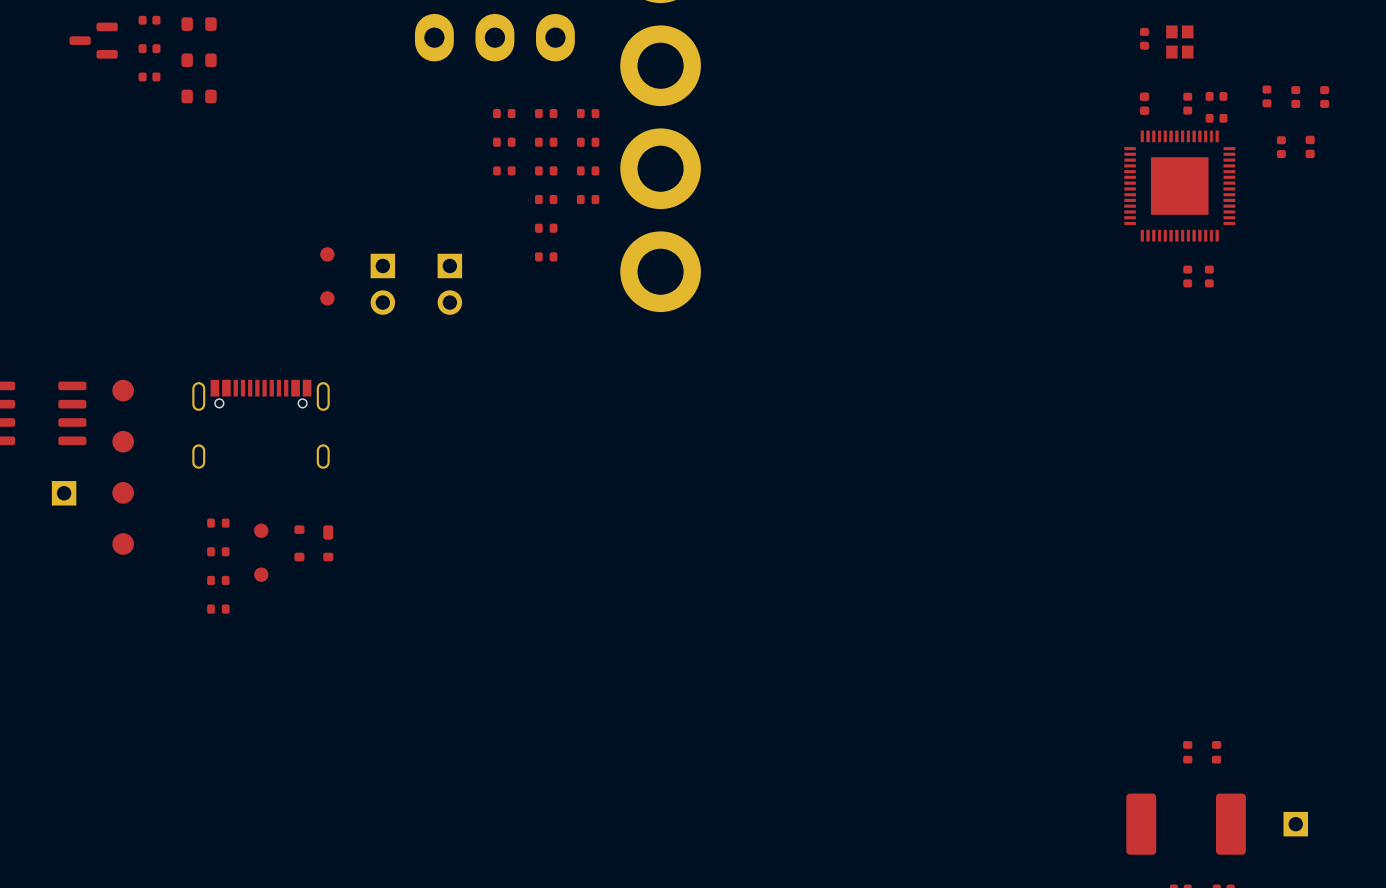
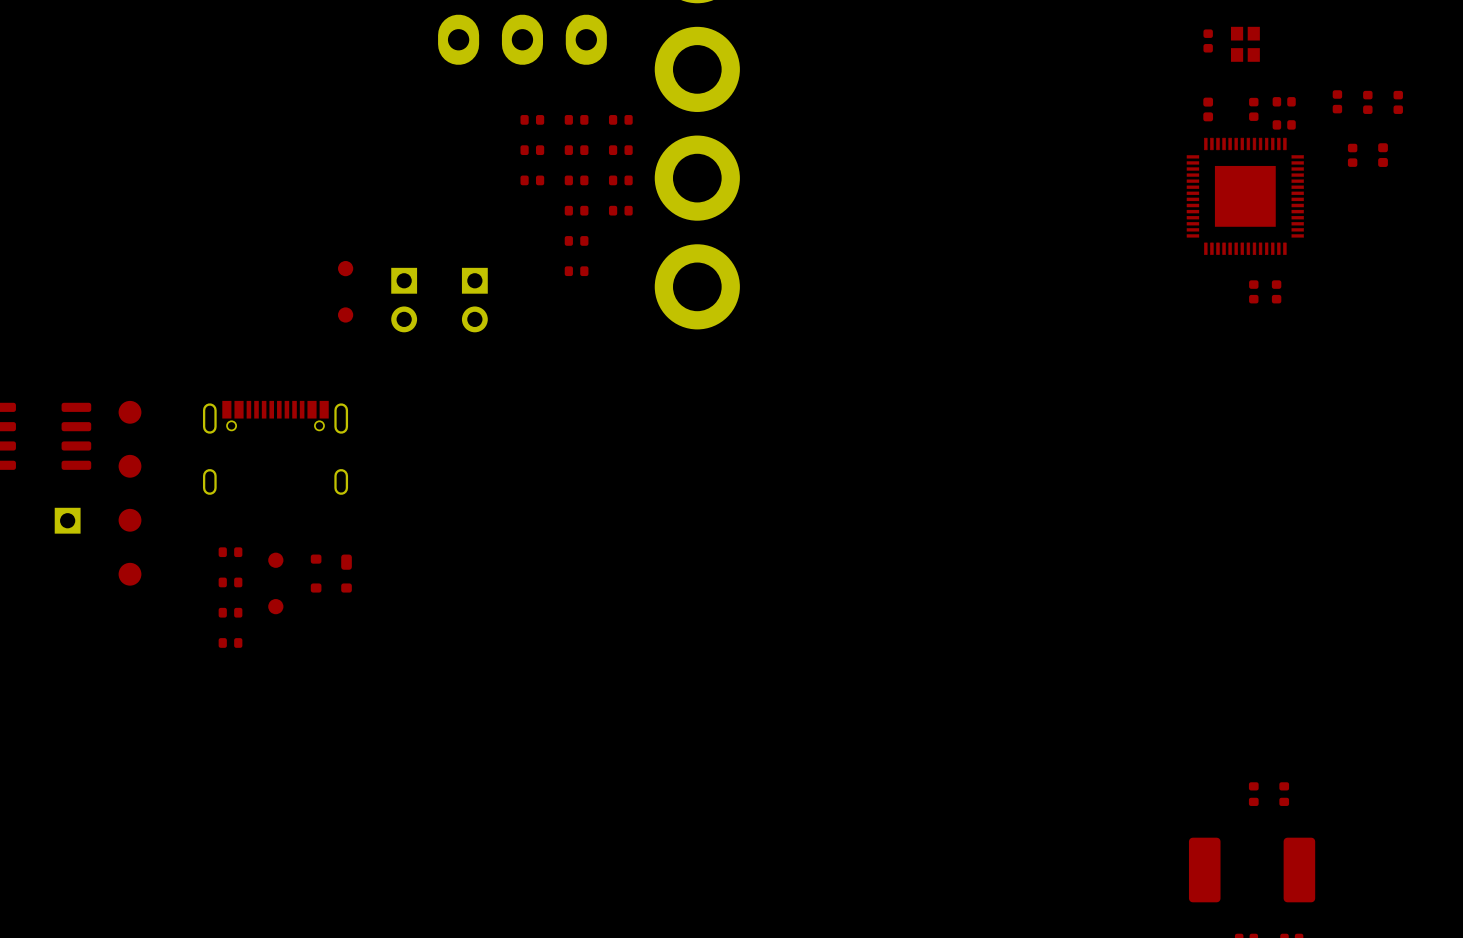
part: (149, 20) -> none
part: (199, 24) -> none
part: (93, 40) -> none
part: (149, 48) -> none
part: (199, 60) -> none
part: (149, 76) -> none
part: (199, 96) -> none
part: (1295, 824) -> none

